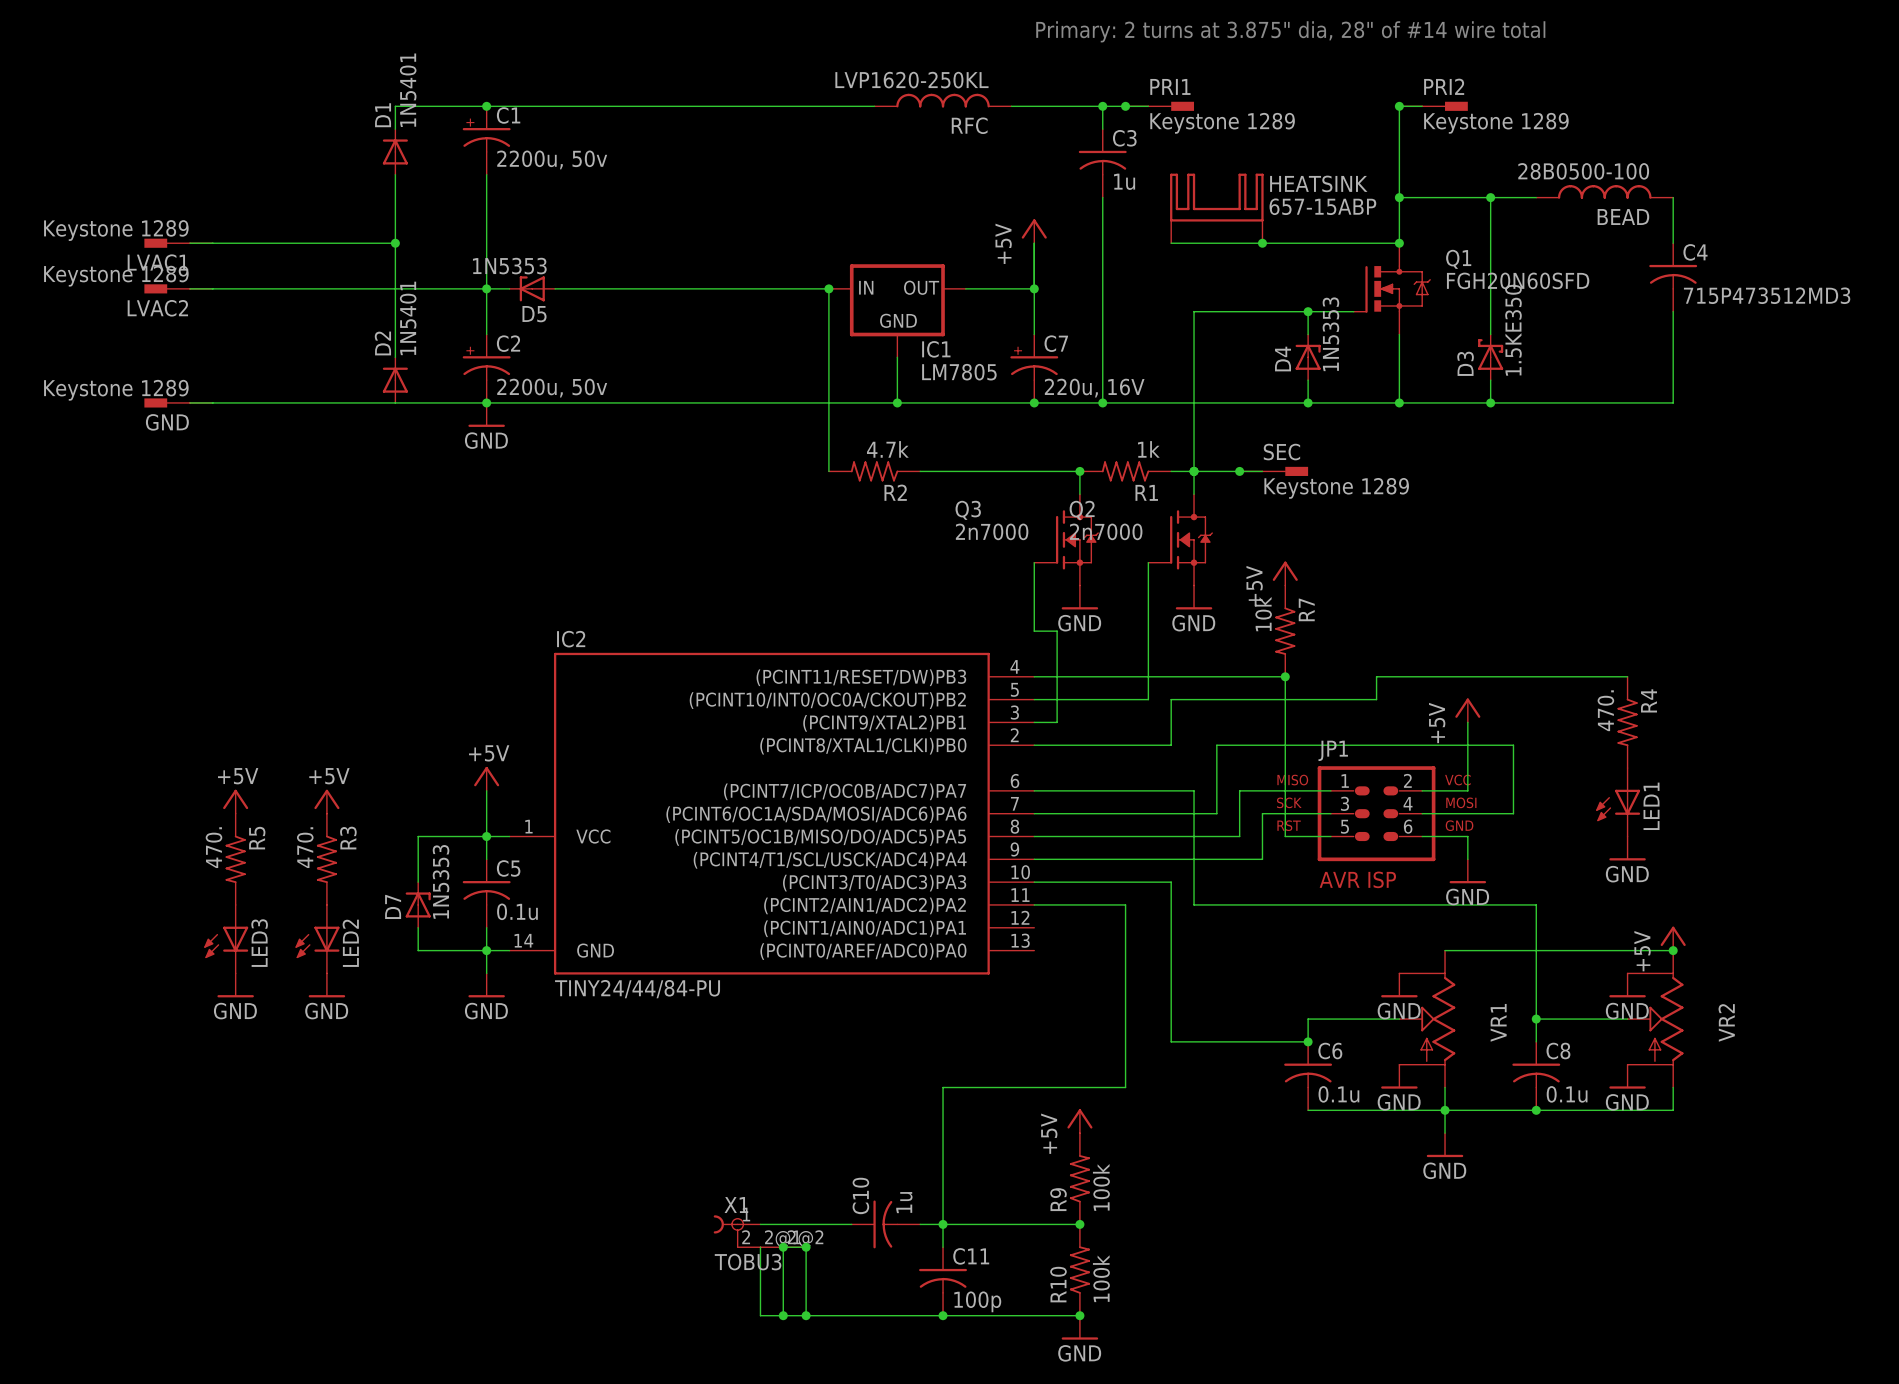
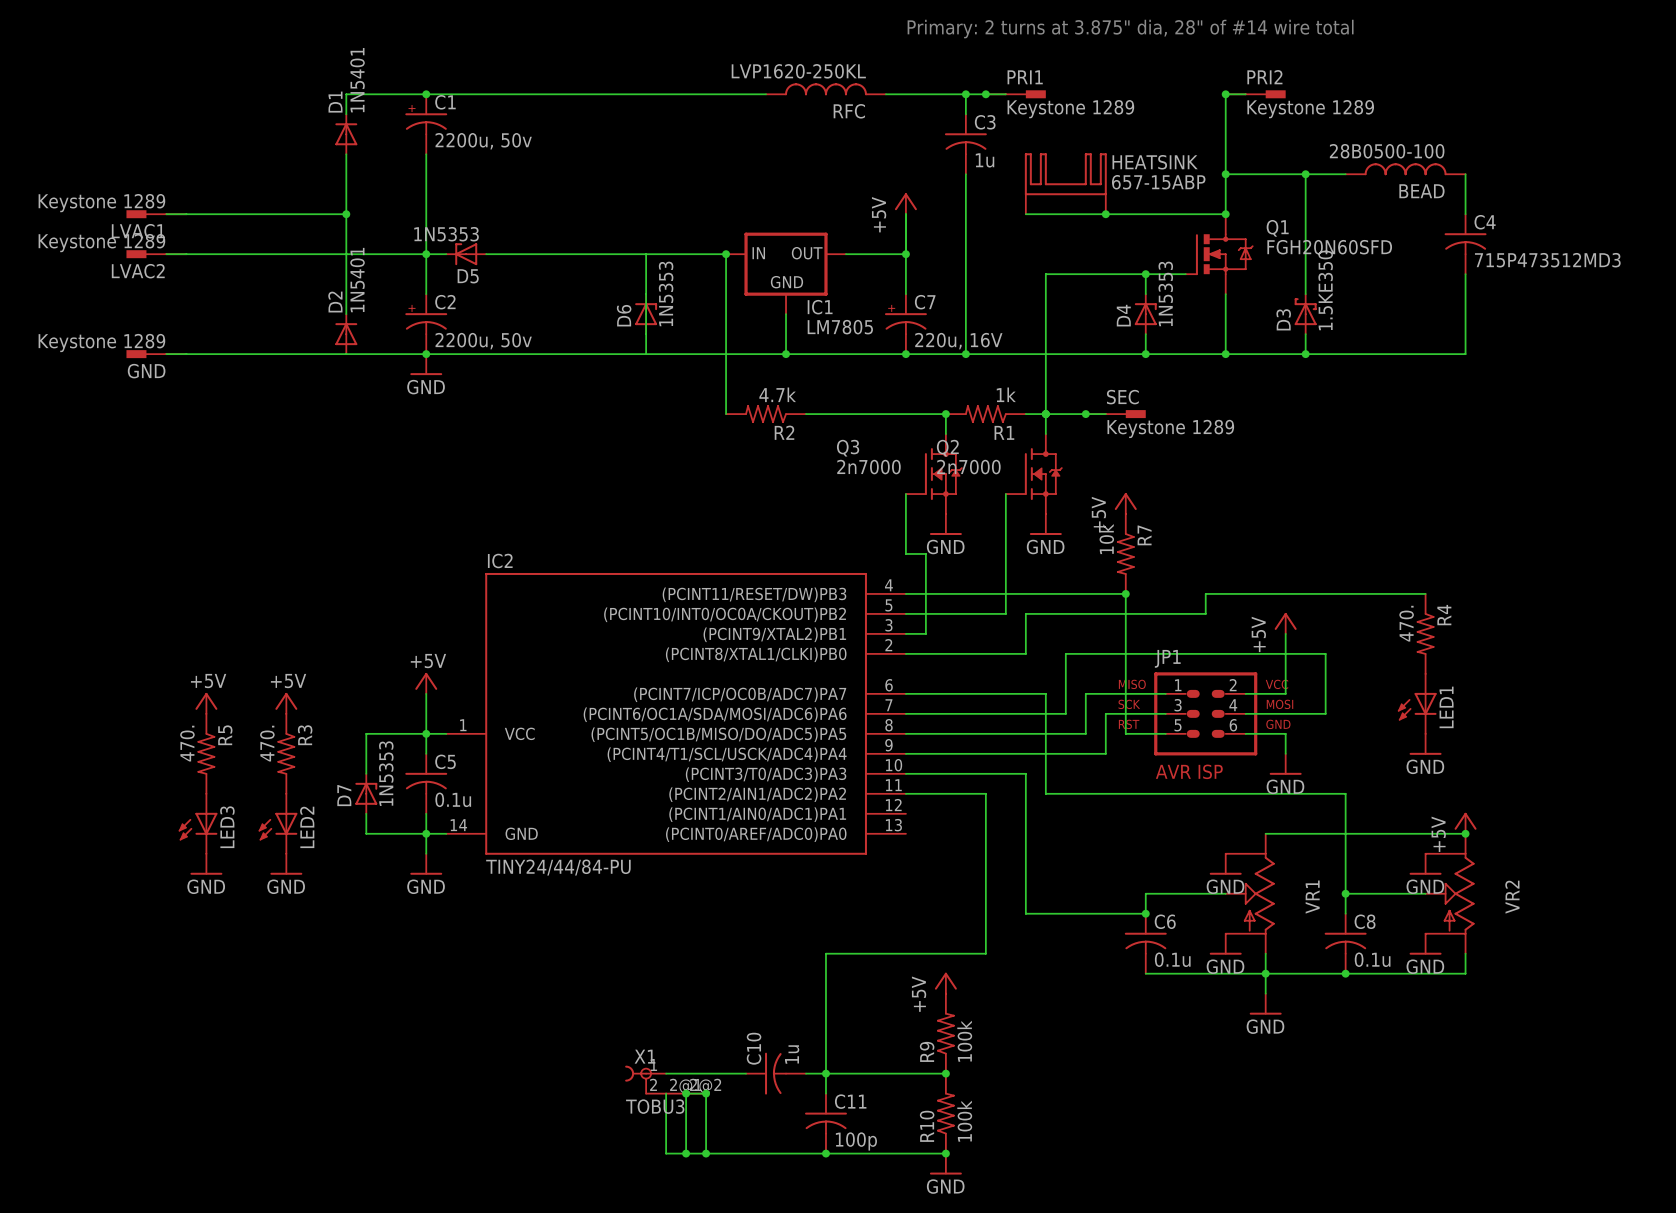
wire: none -> (646, 254) (646, 354)
D6: none -> 1N5353 (646, 314)

